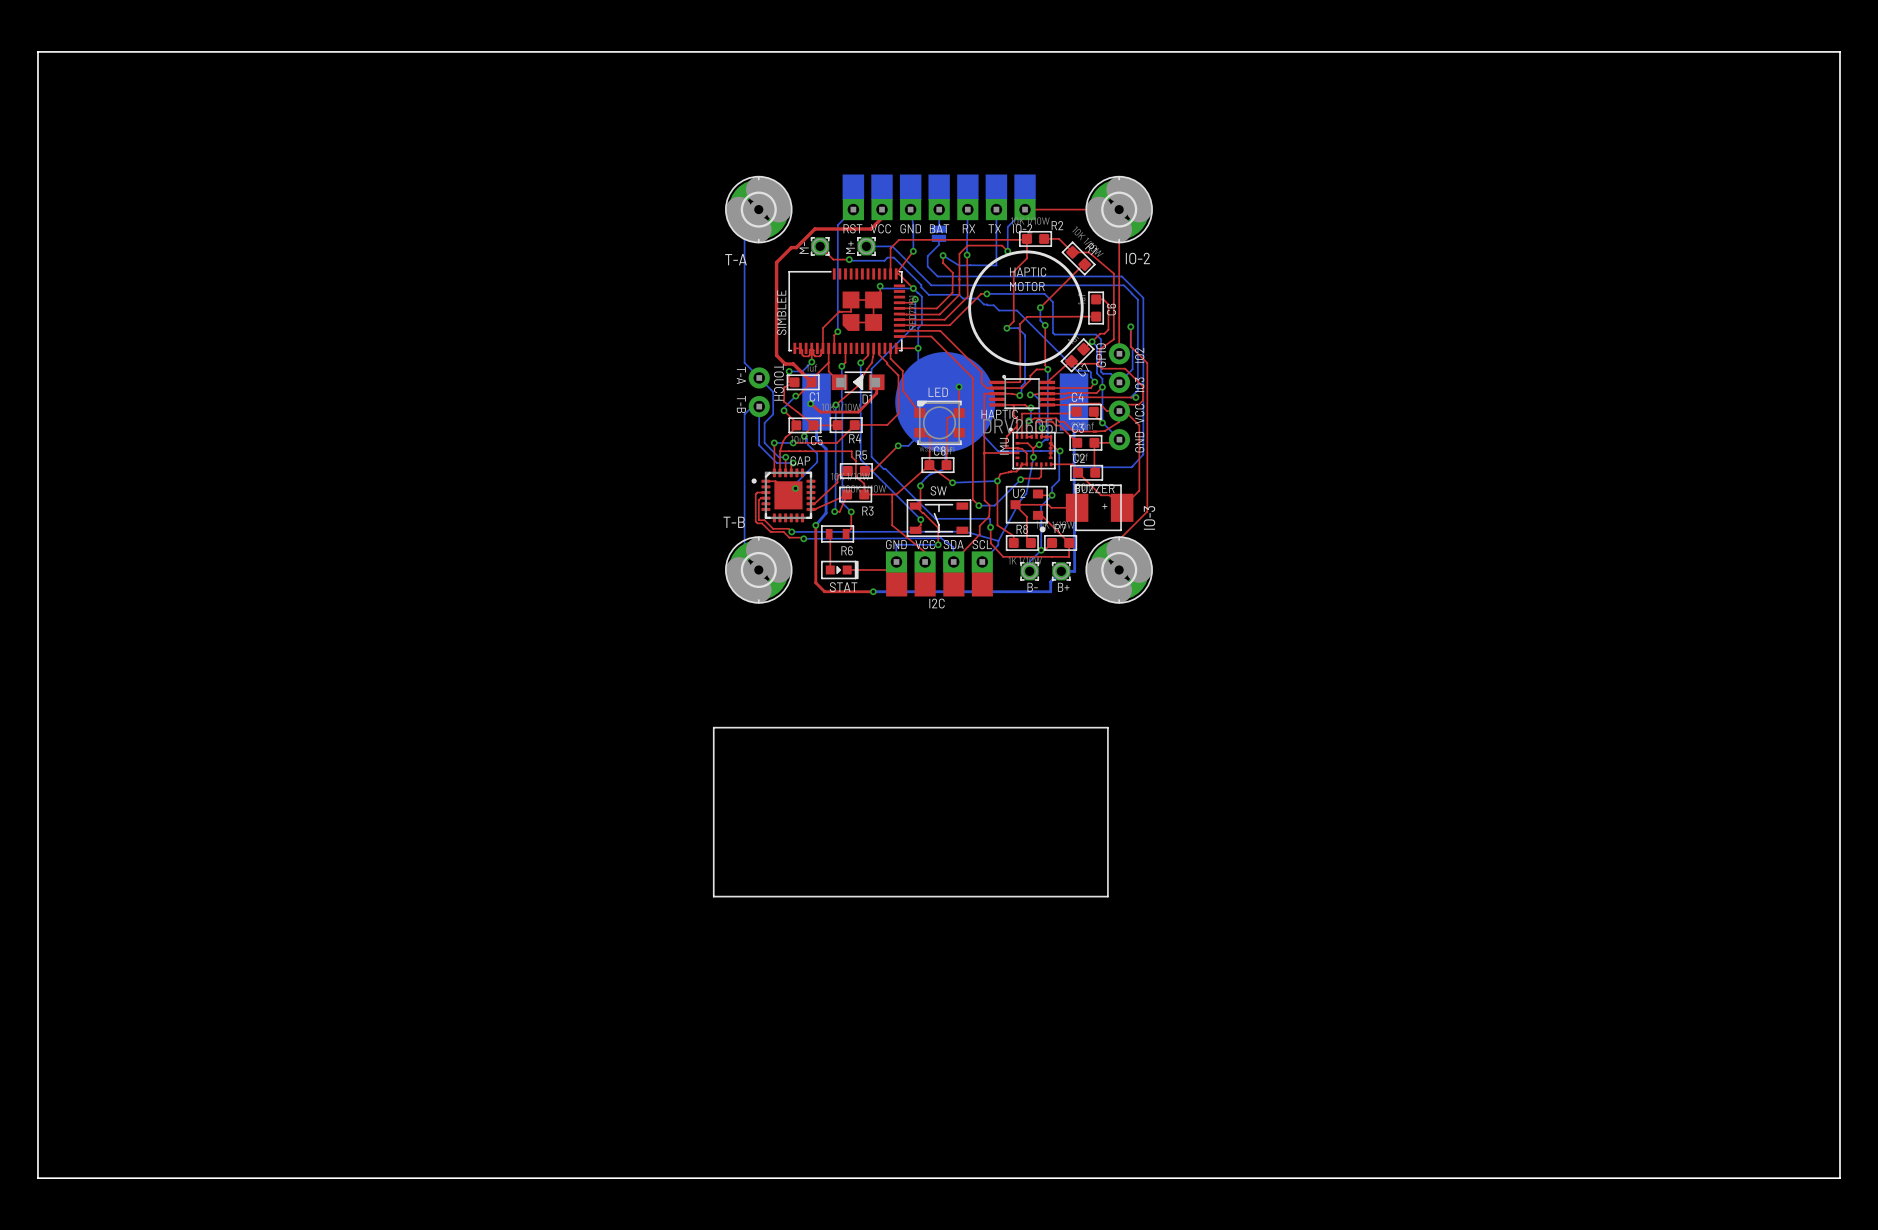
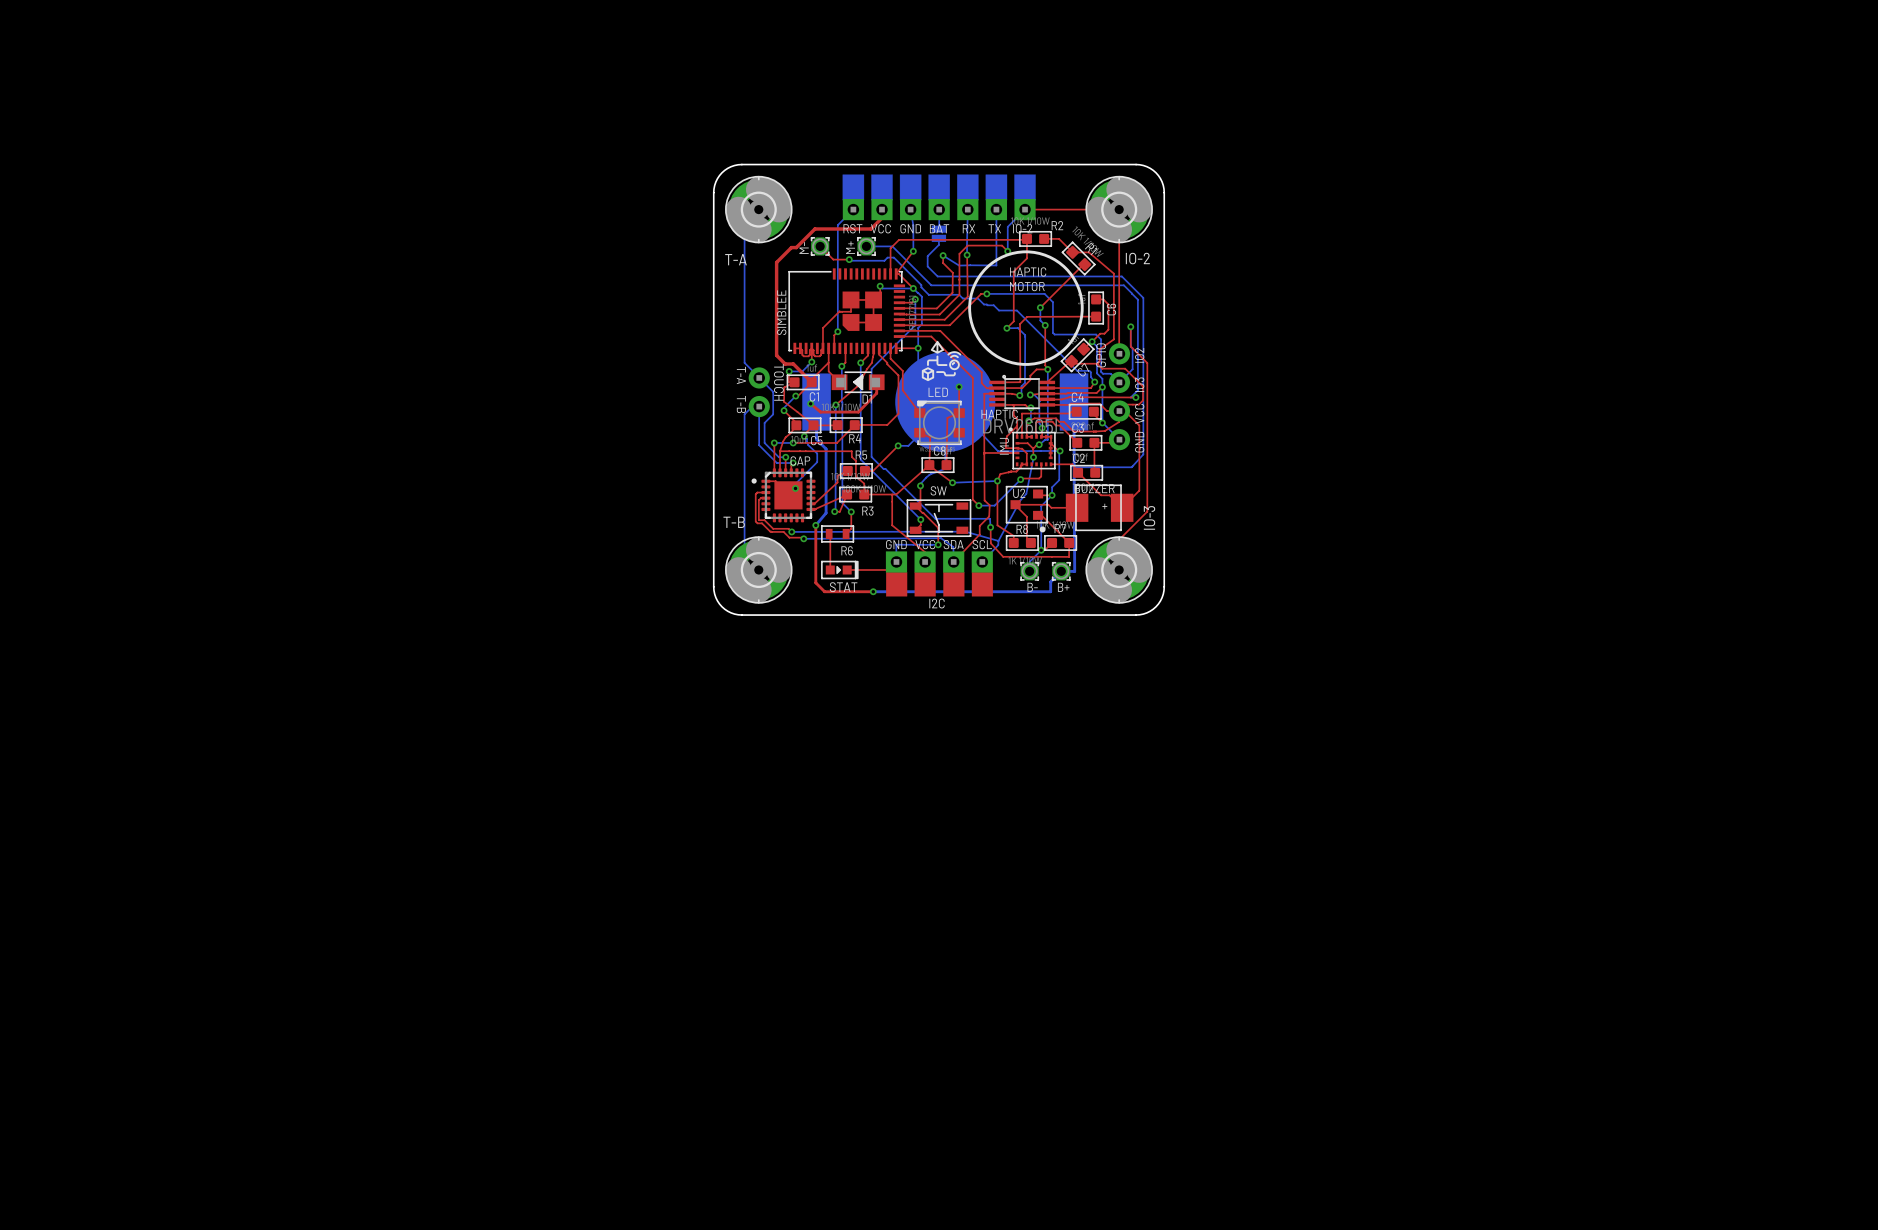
board edge: (37, 51) (1839, 51) (1839, 1178) (37, 1178) (37, 51) -> none
board edge: none -> (741, 164) (1136, 164) (1146, 166) (1155, 172) (1162, 181) (1164, 192) (1164, 586) (1162, 597) (1155, 606) (1146, 612) (1136, 615) (741, 615) (731, 612) (721, 606) (715, 597) (713, 586) (713, 192) (715, 181) (721, 172) (731, 166) (741, 164)
drawing: none -> [921, 340, 962, 382]
line: (713, 727) (1107, 727) (1107, 896) (713, 896) (713, 727) -> none

